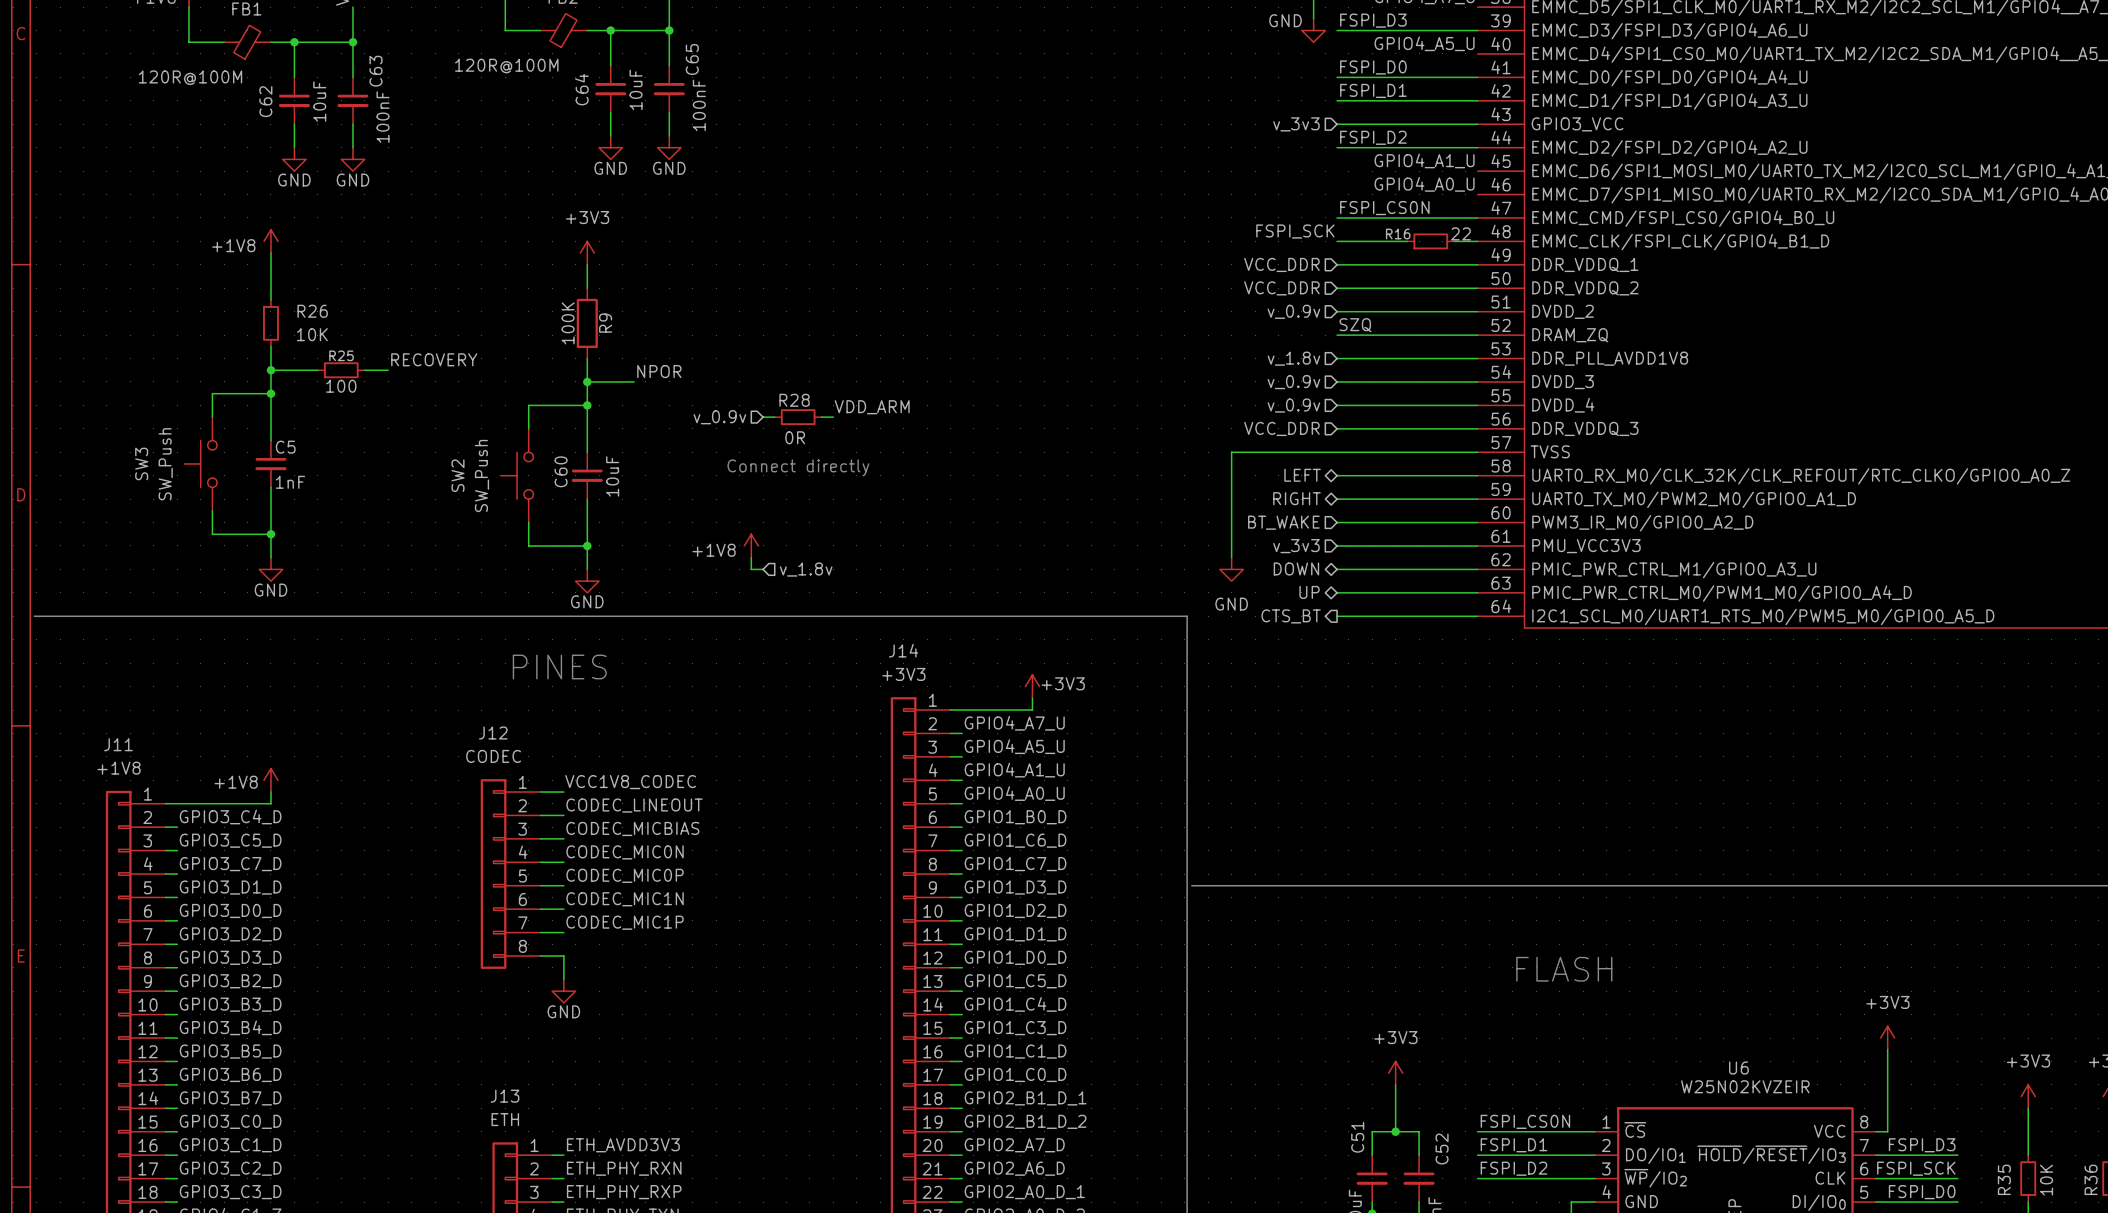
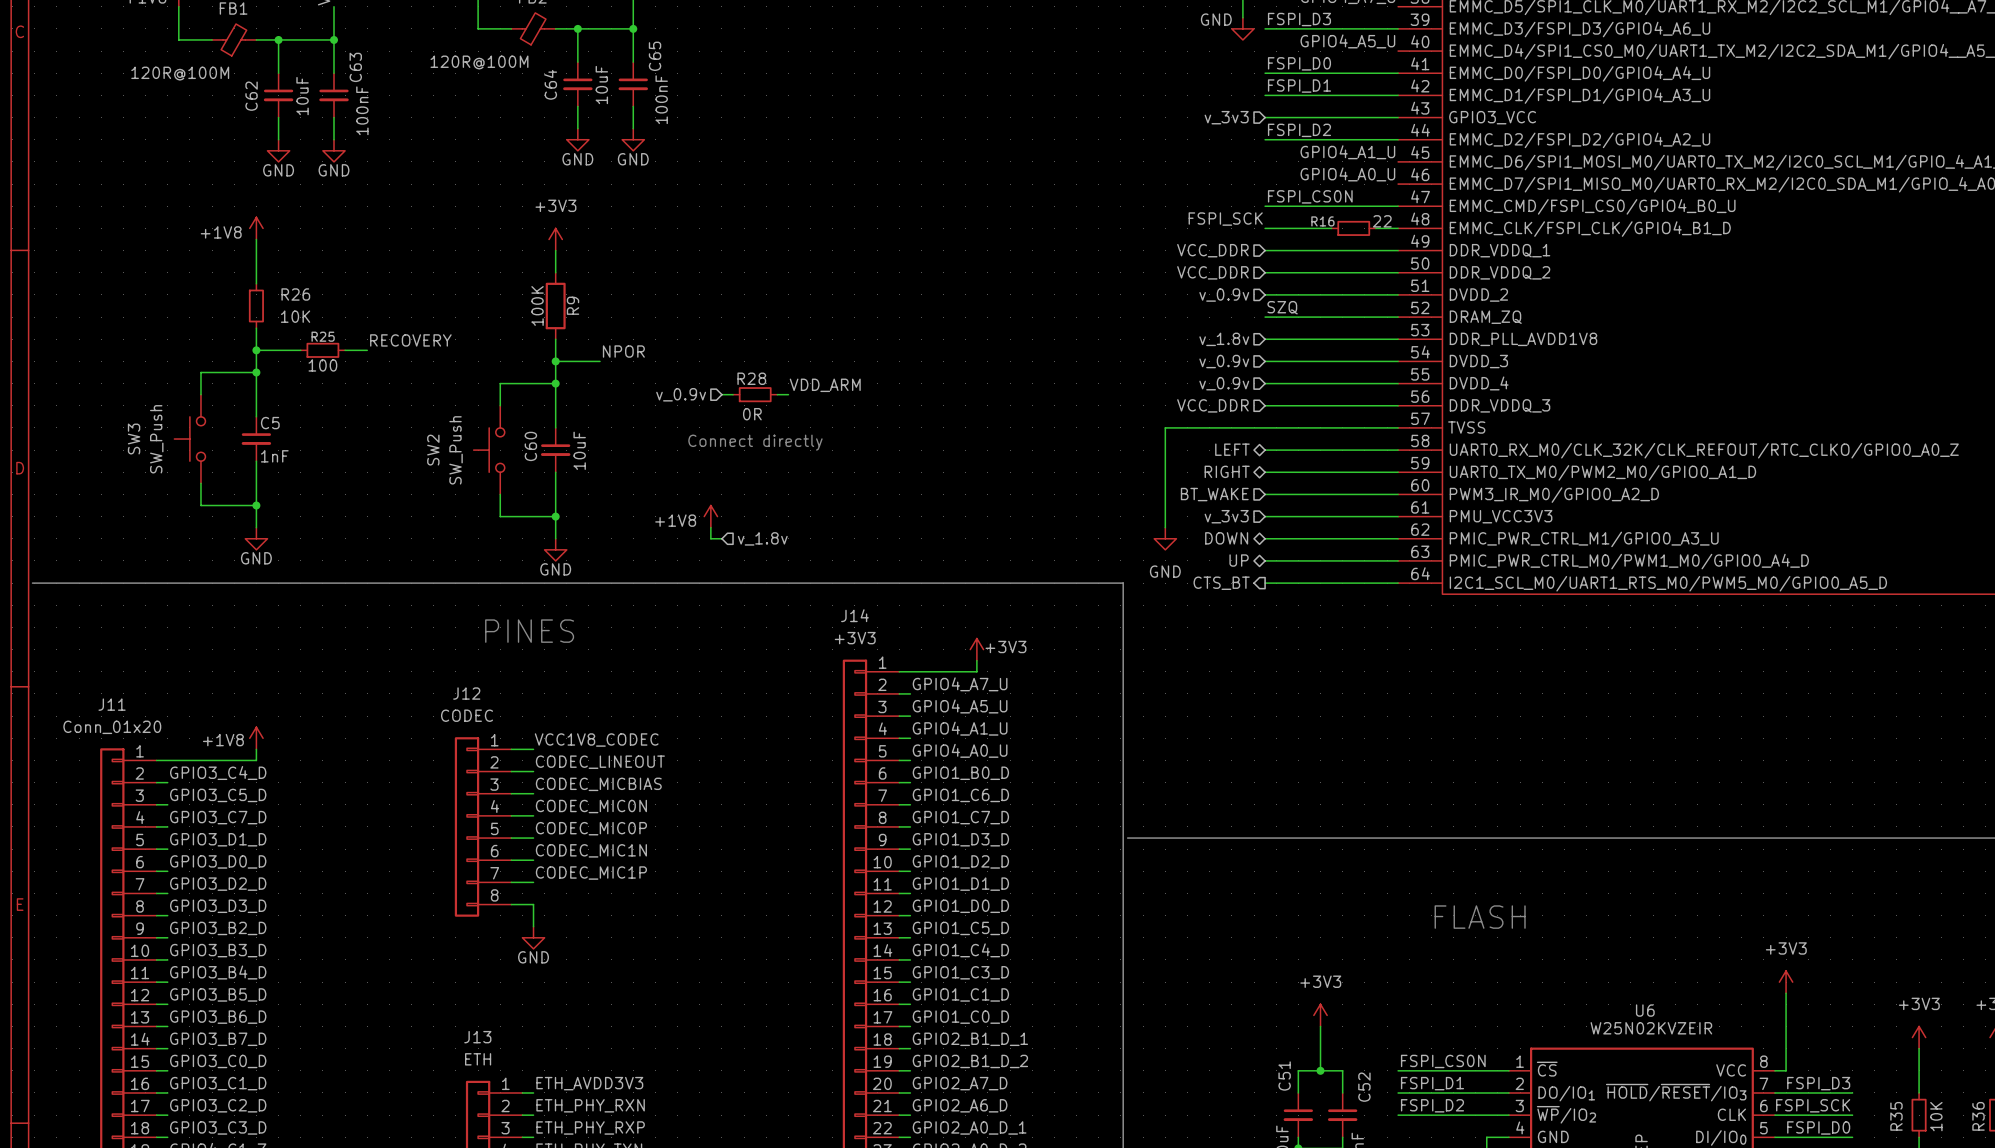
J11 value: +1V8 (118, 768) -> Conn_01x20 (112, 727)

